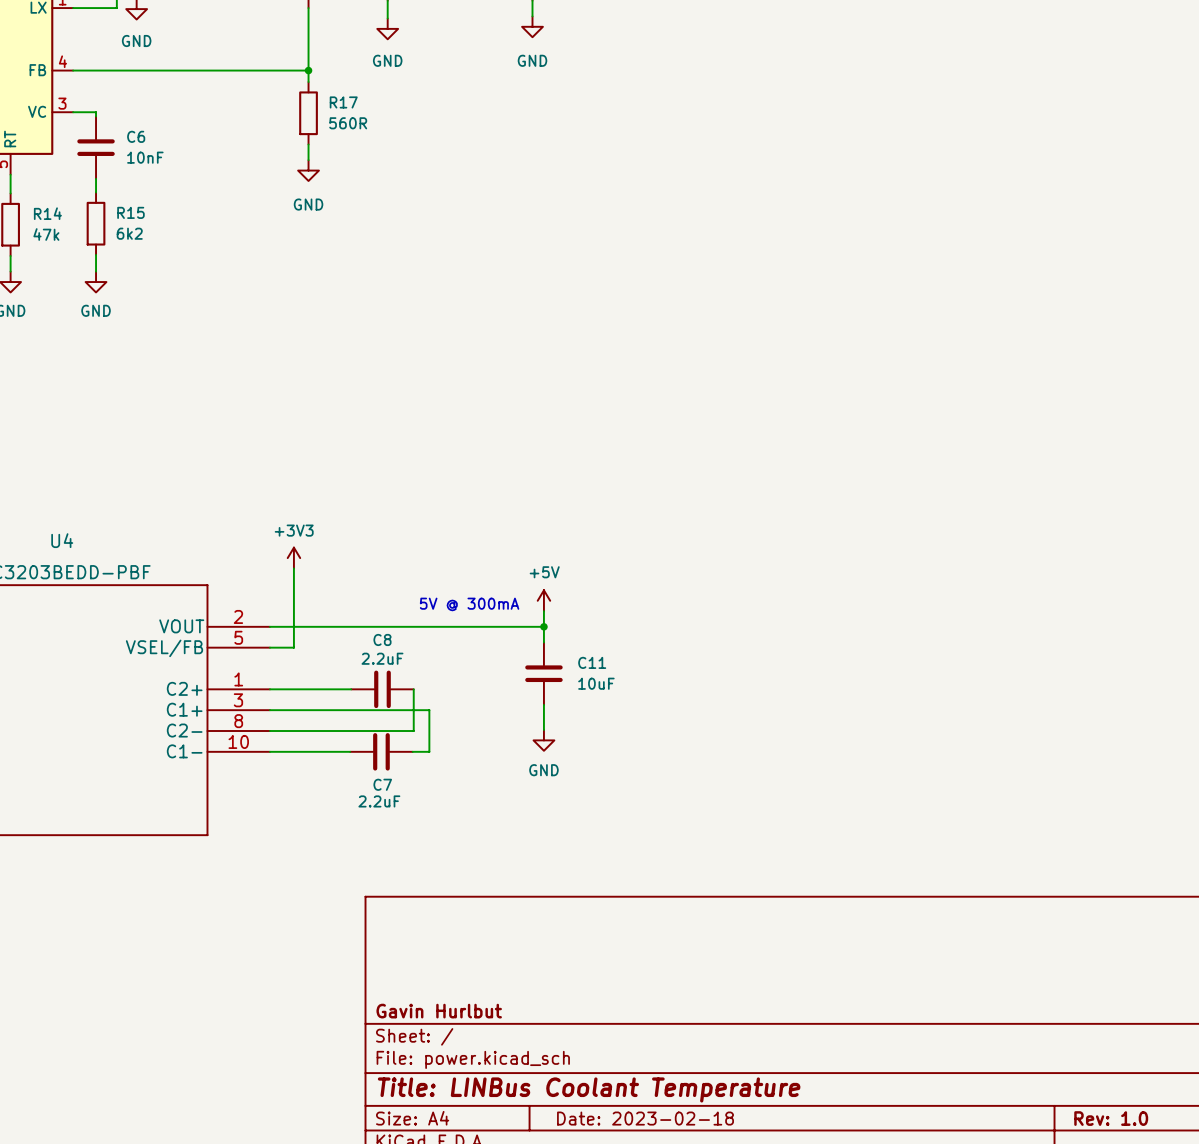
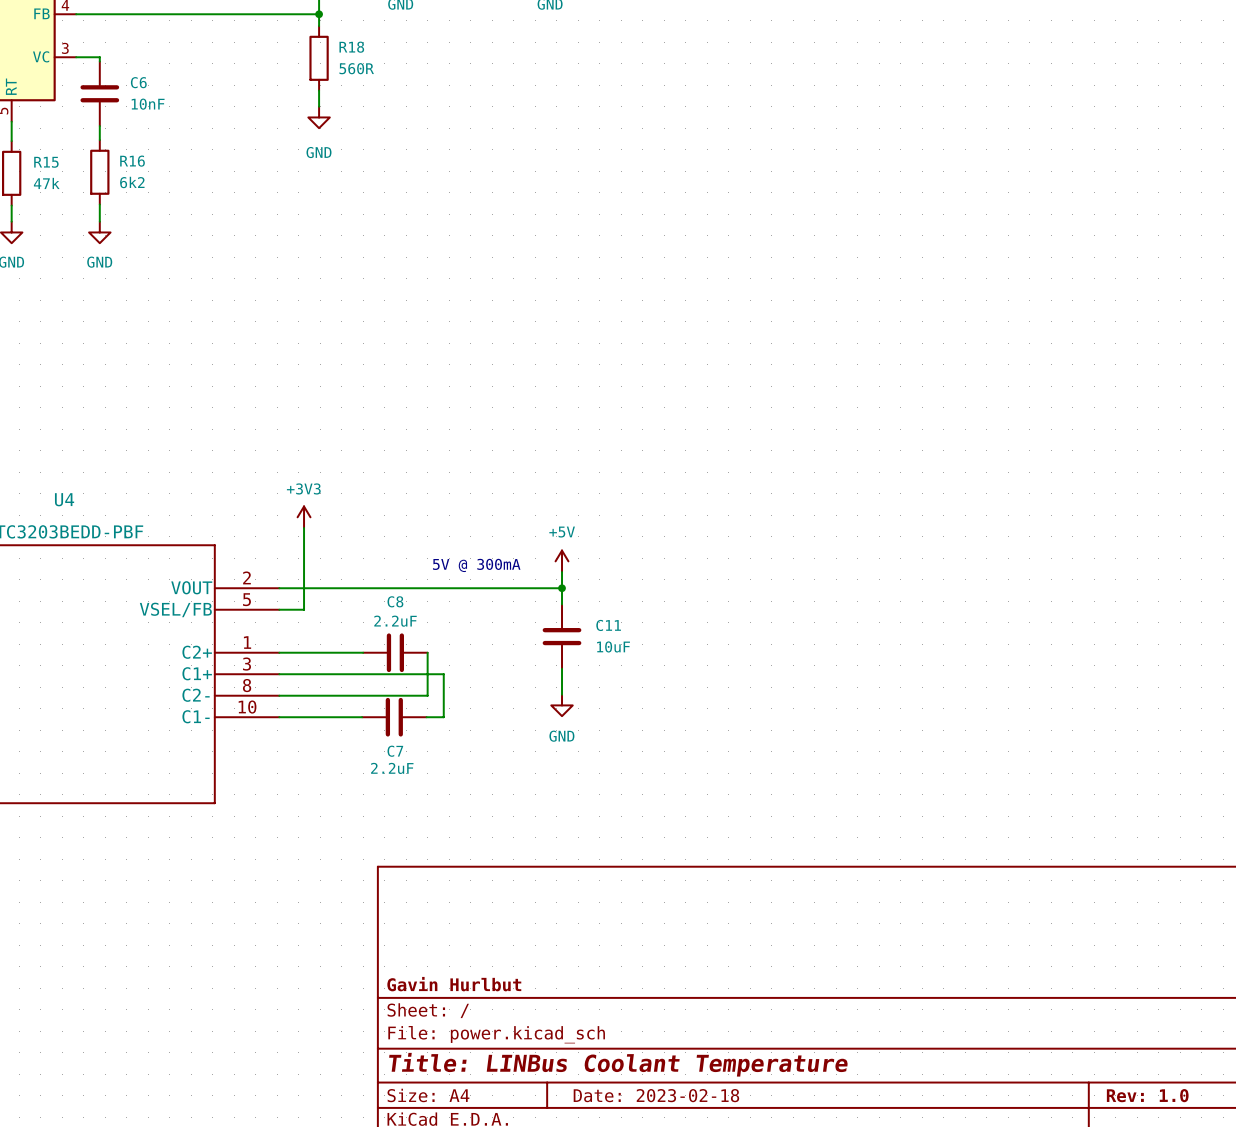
R17 name: R17 (343, 102) -> R18 (351, 47)
R15 name: R15 (130, 212) -> R16 (132, 161)
R14 name: R14 (47, 213) -> R15 (46, 162)

